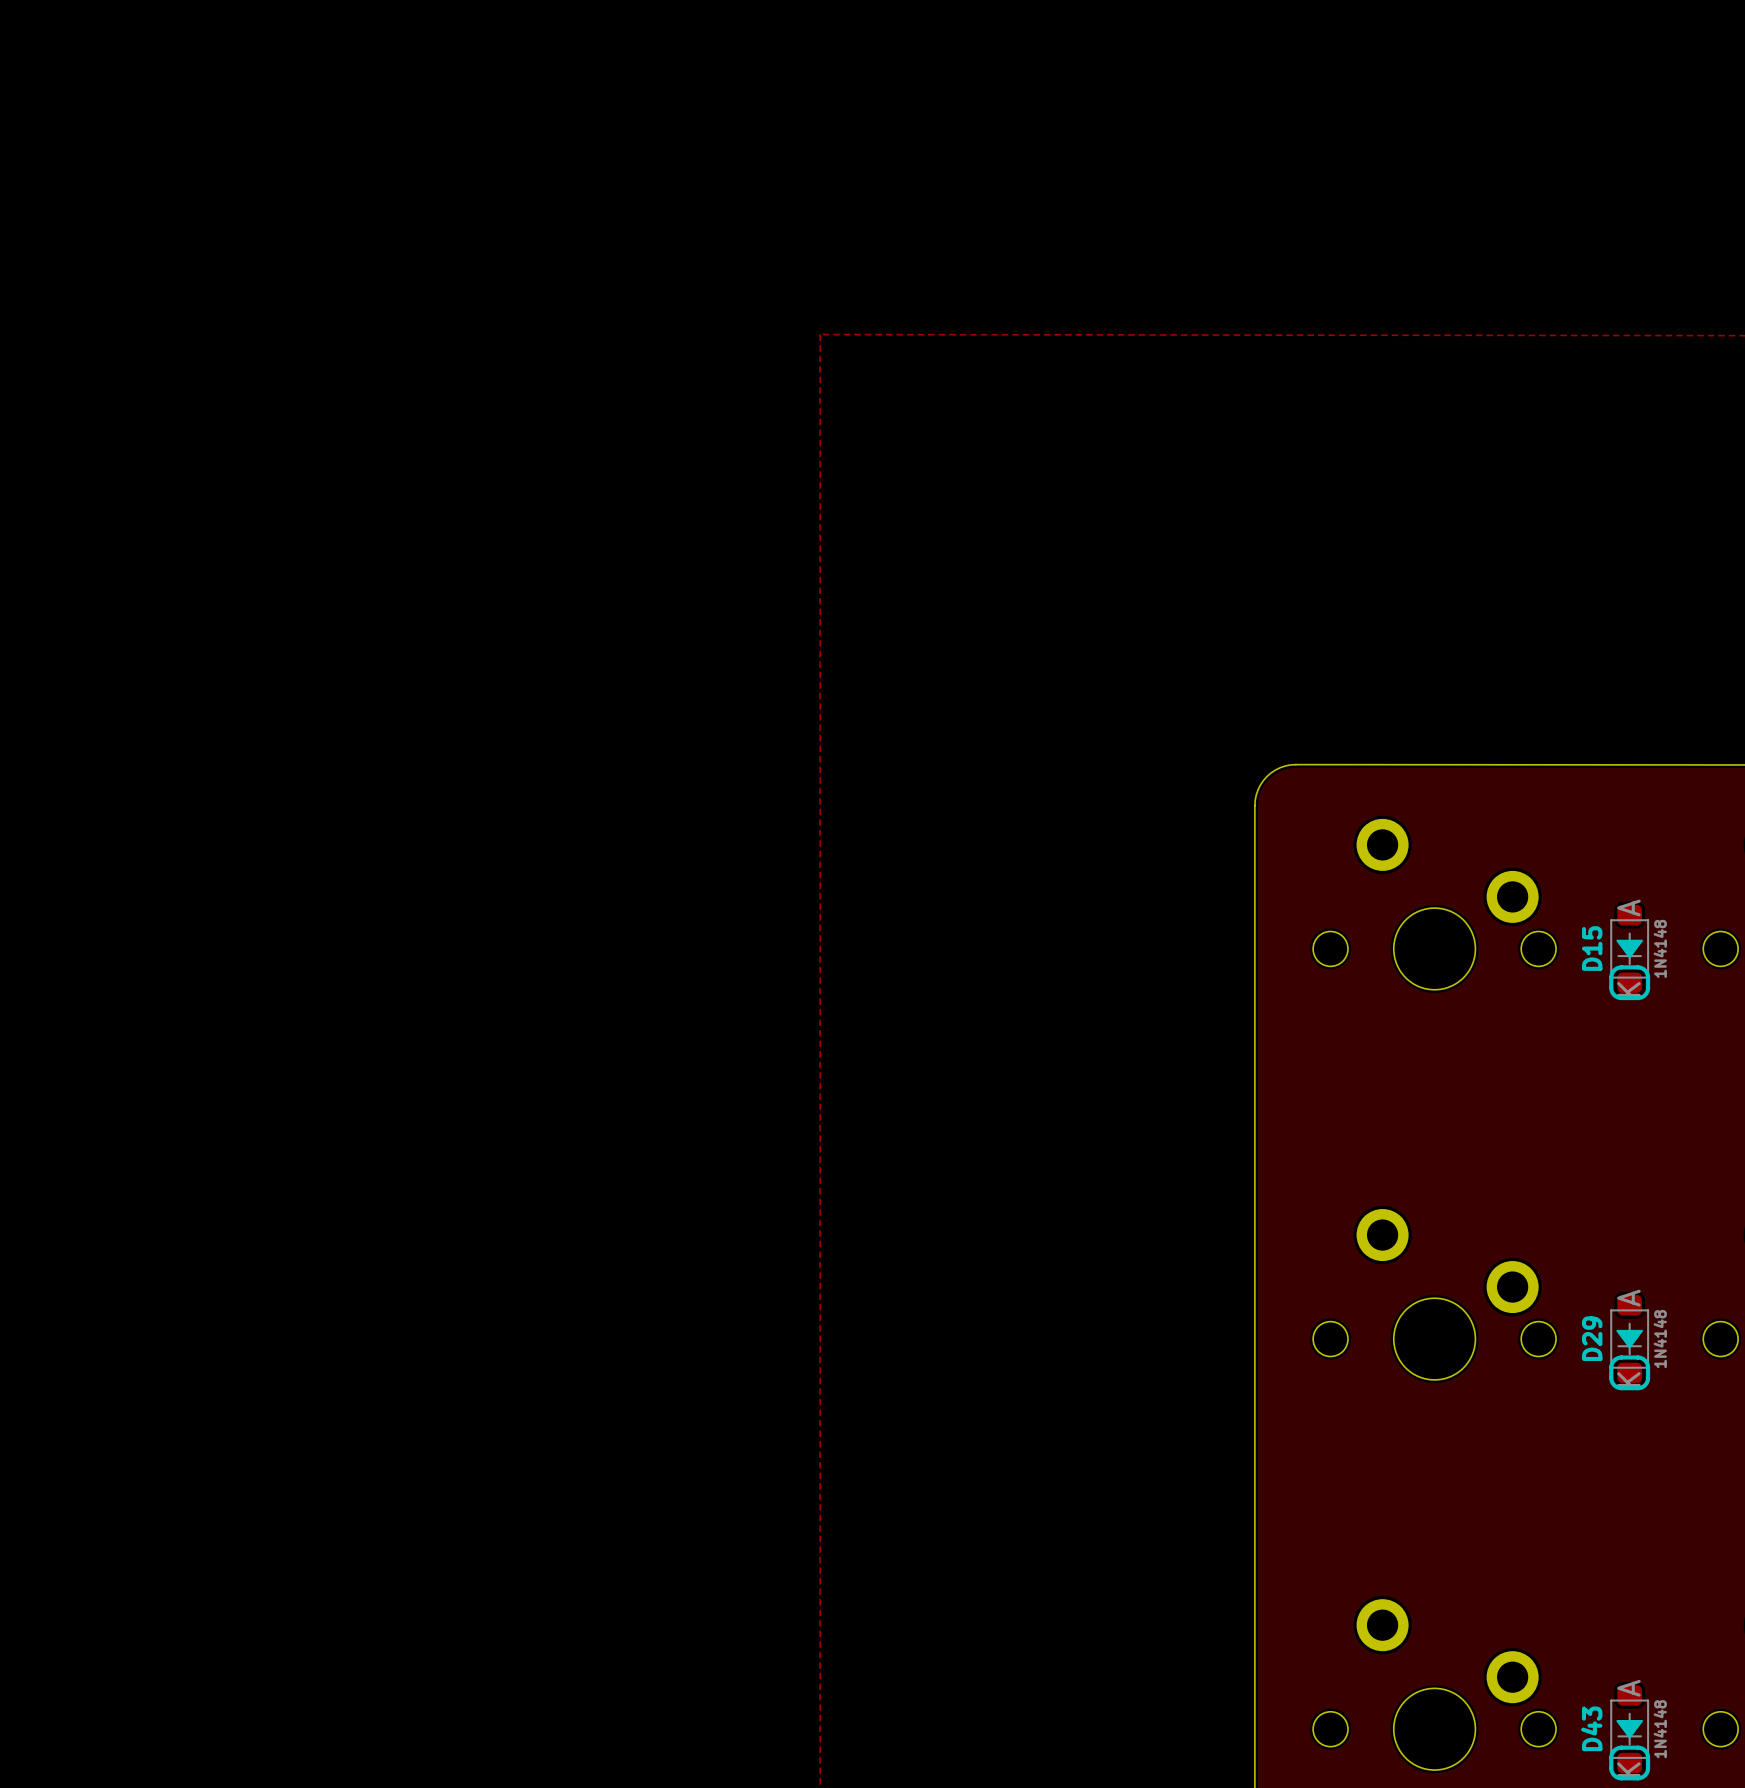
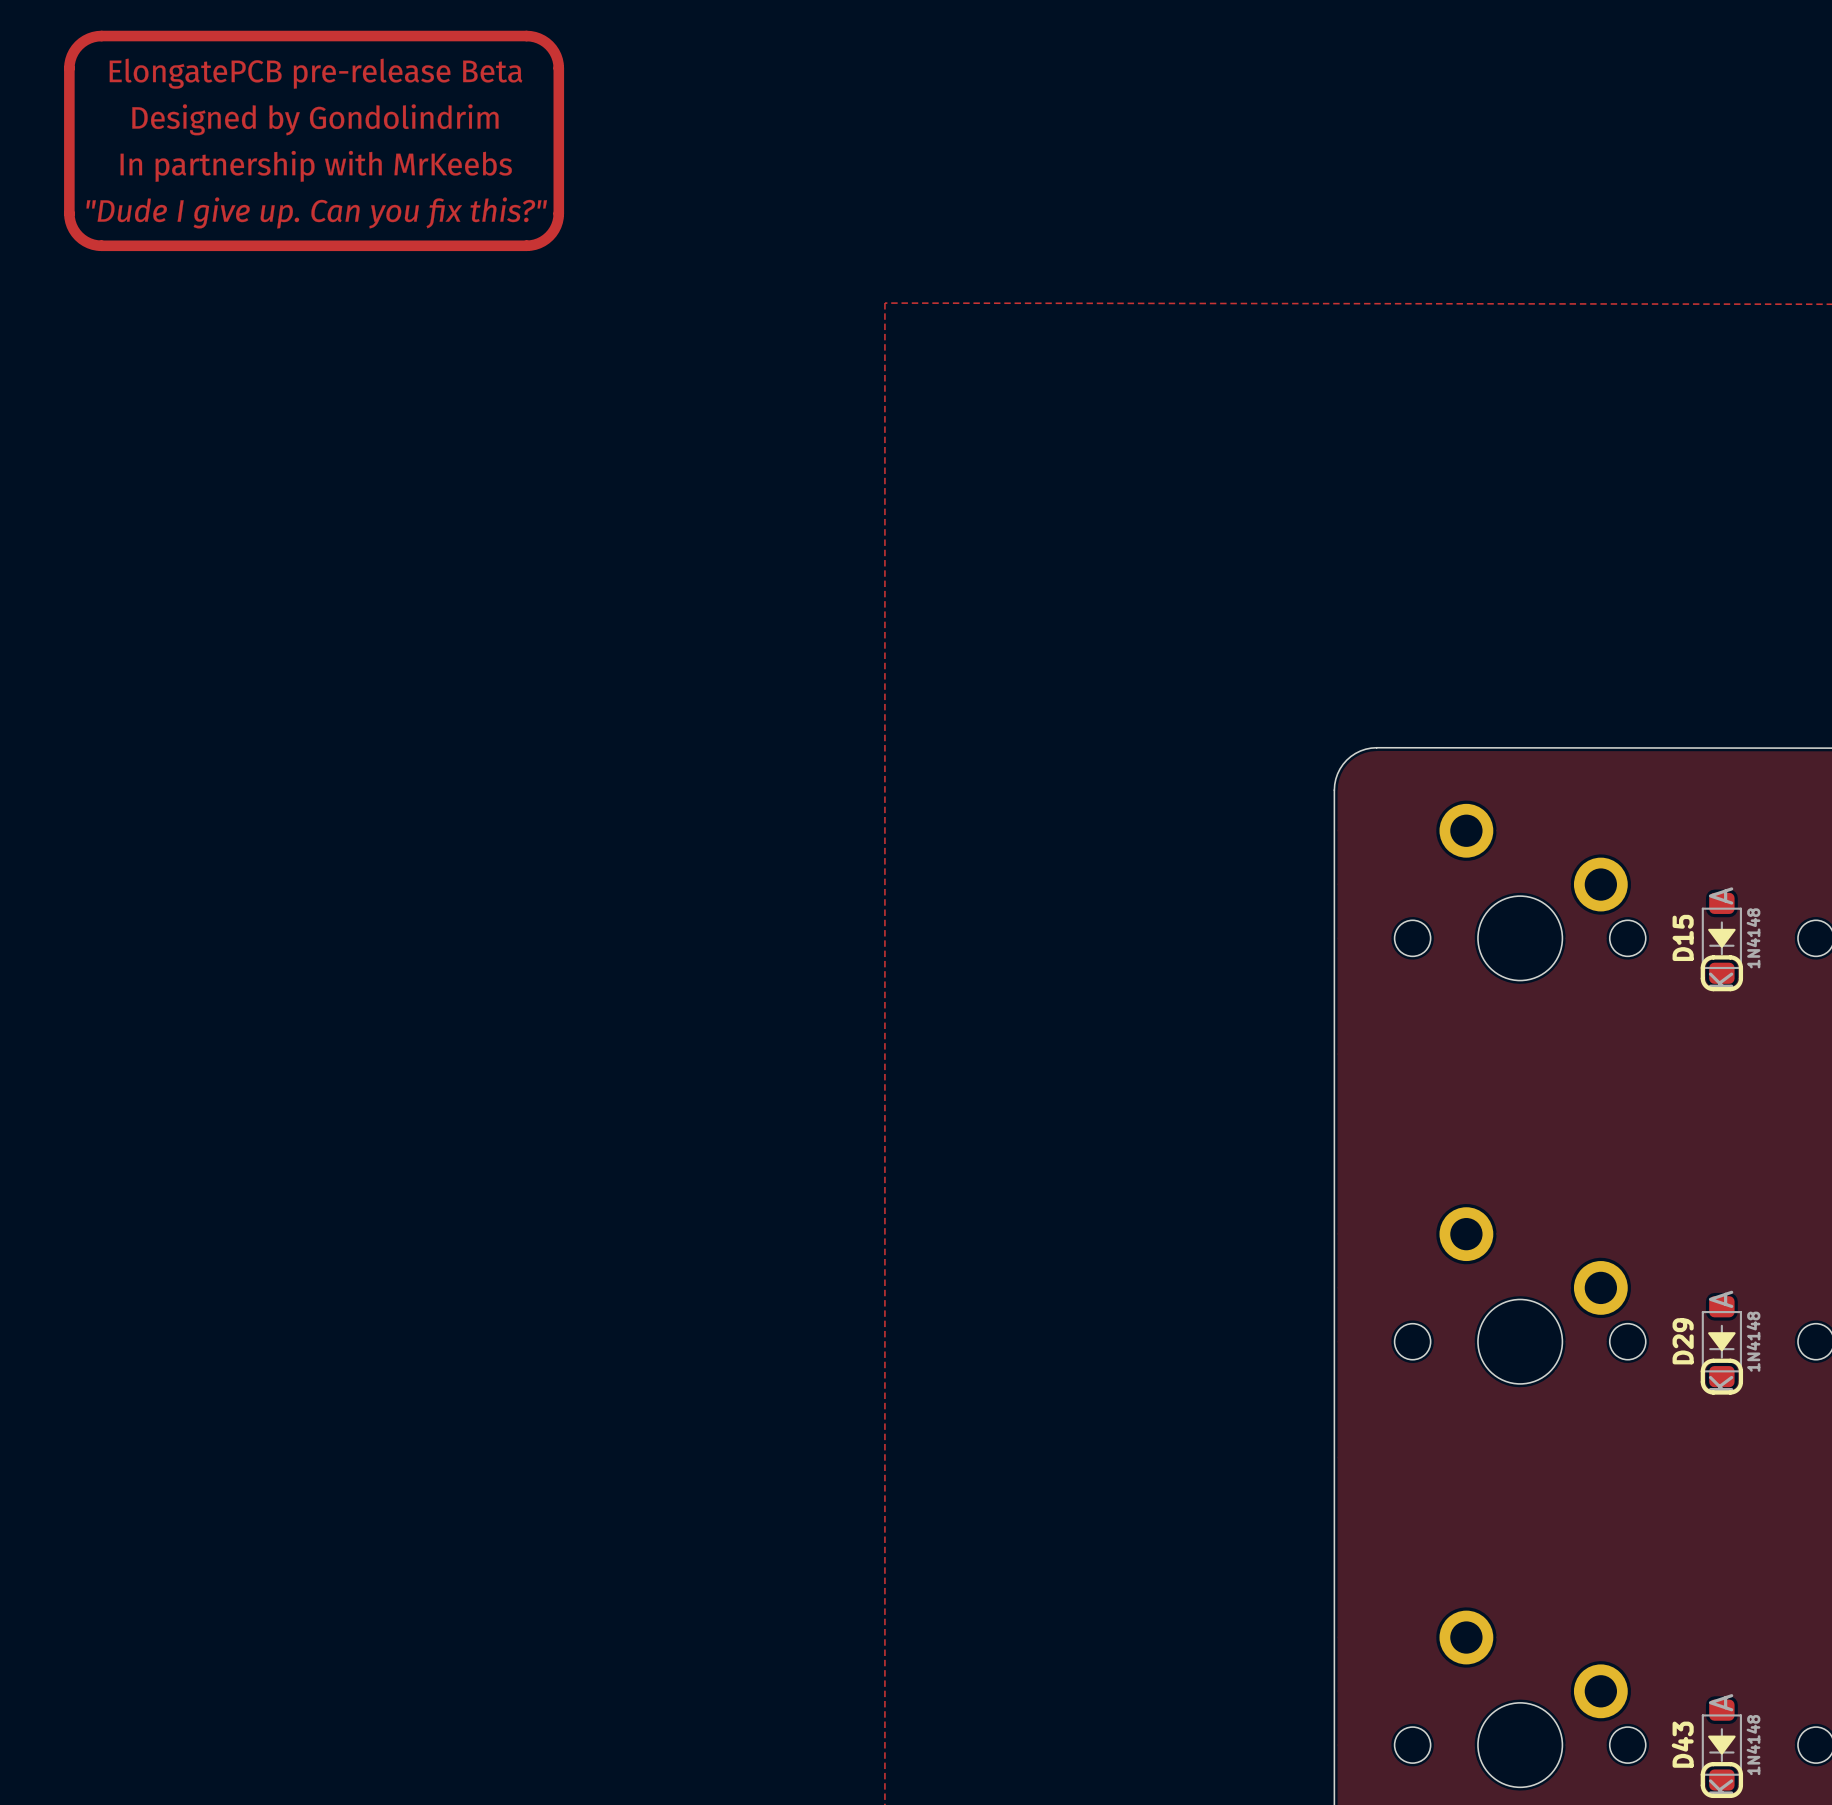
drawing: none -> [64, 30, 565, 252]

